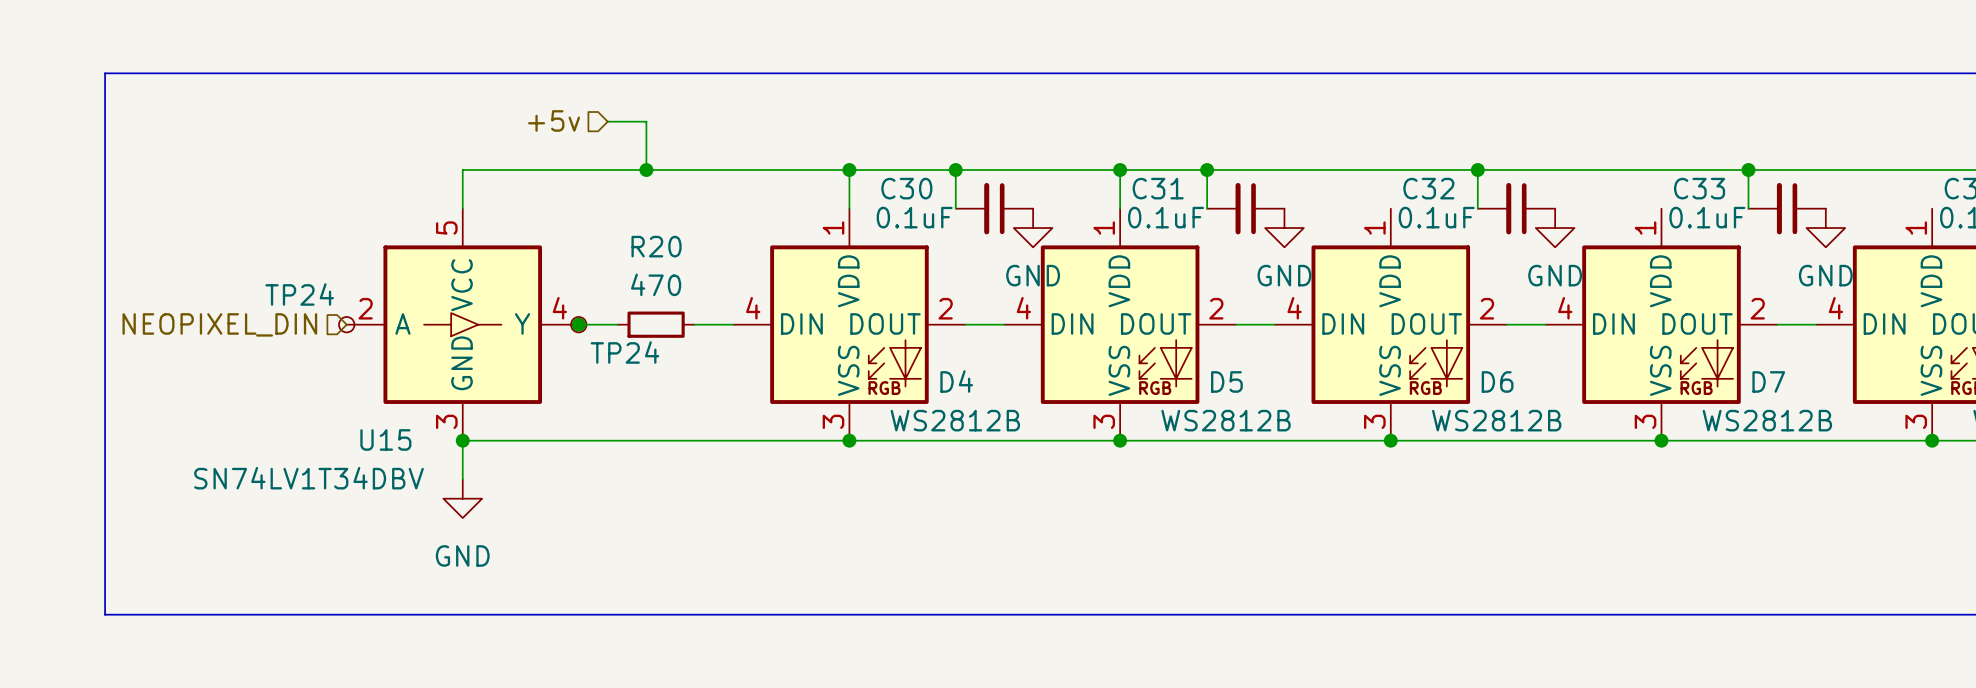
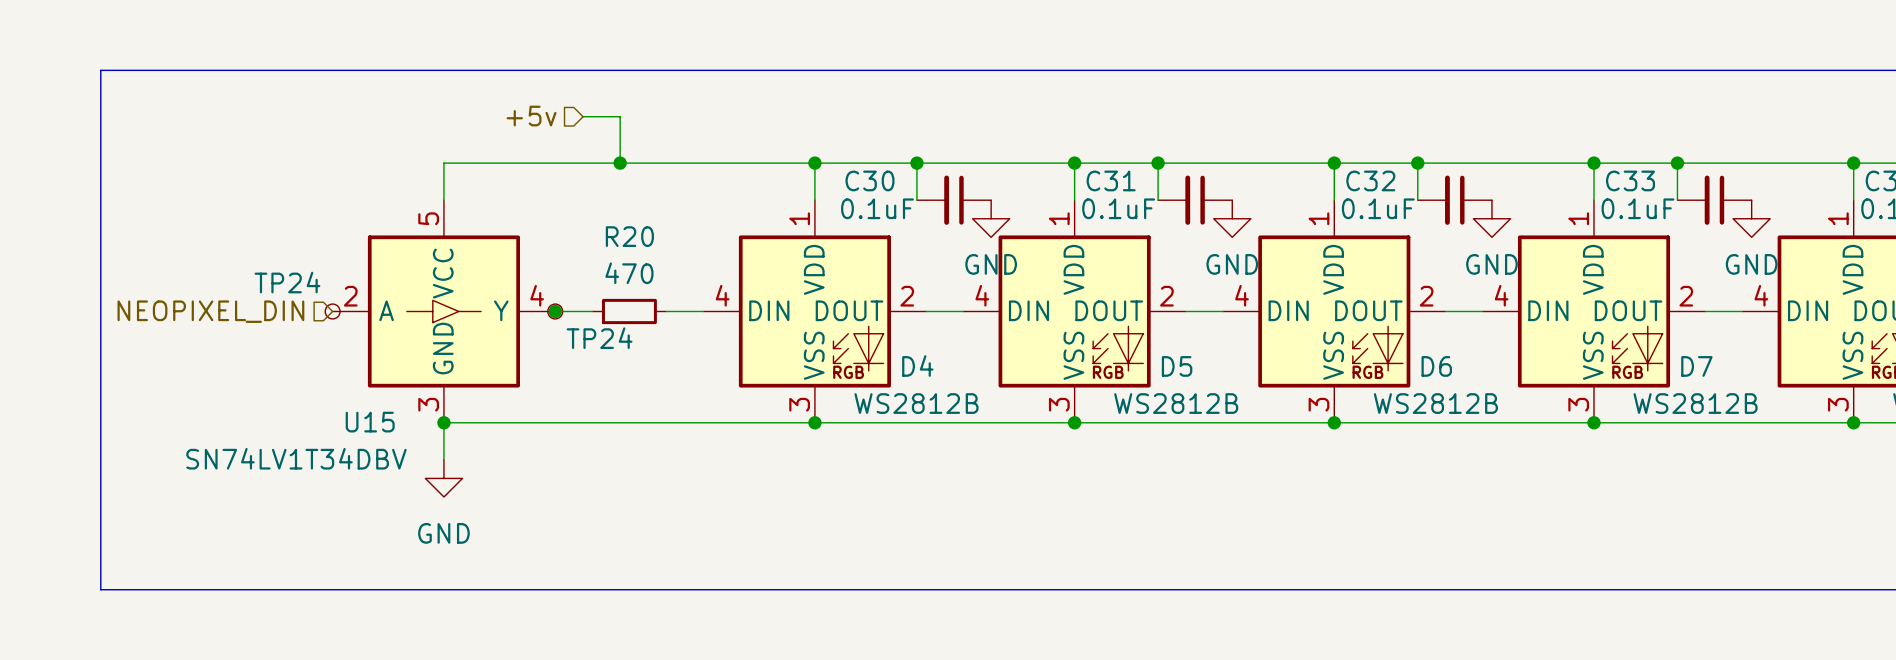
wire: none -> (1334, 163) (1334, 200)
junction: none -> (1334, 163)
wire: none -> (1593, 163) (1593, 200)
junction: none -> (1593, 163)
wire: none -> (1853, 163) (1853, 200)
junction: none -> (1853, 163)

